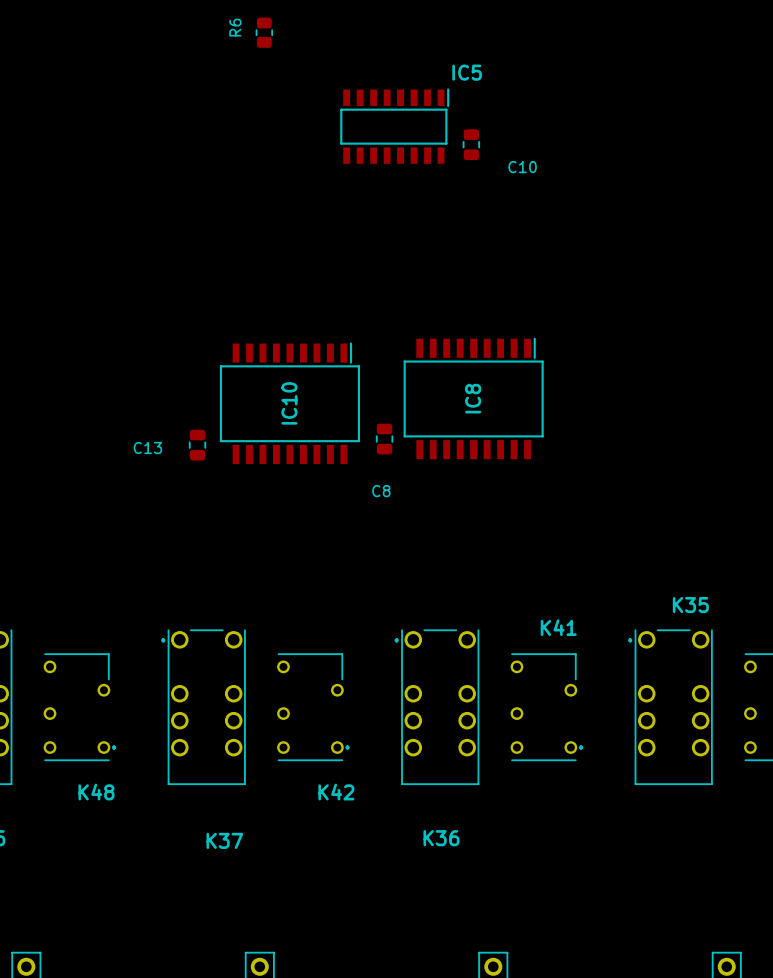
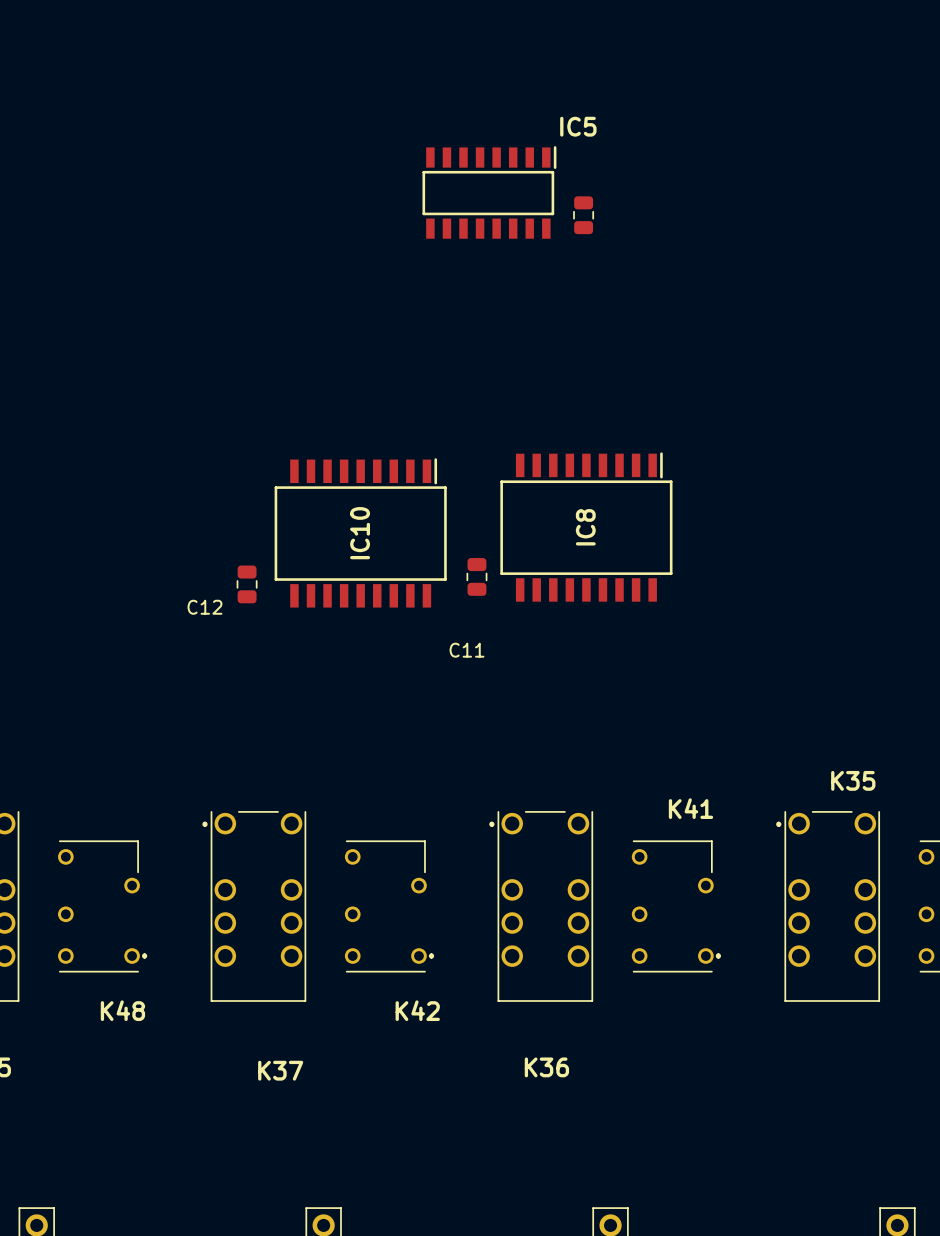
R6: (264, 32) -> none
C10 name: C10 (522, 167) -> none
C13 name: C13 (147, 447) -> C12 (204, 607)
C8 name: C8 (381, 491) -> C11 (467, 650)

